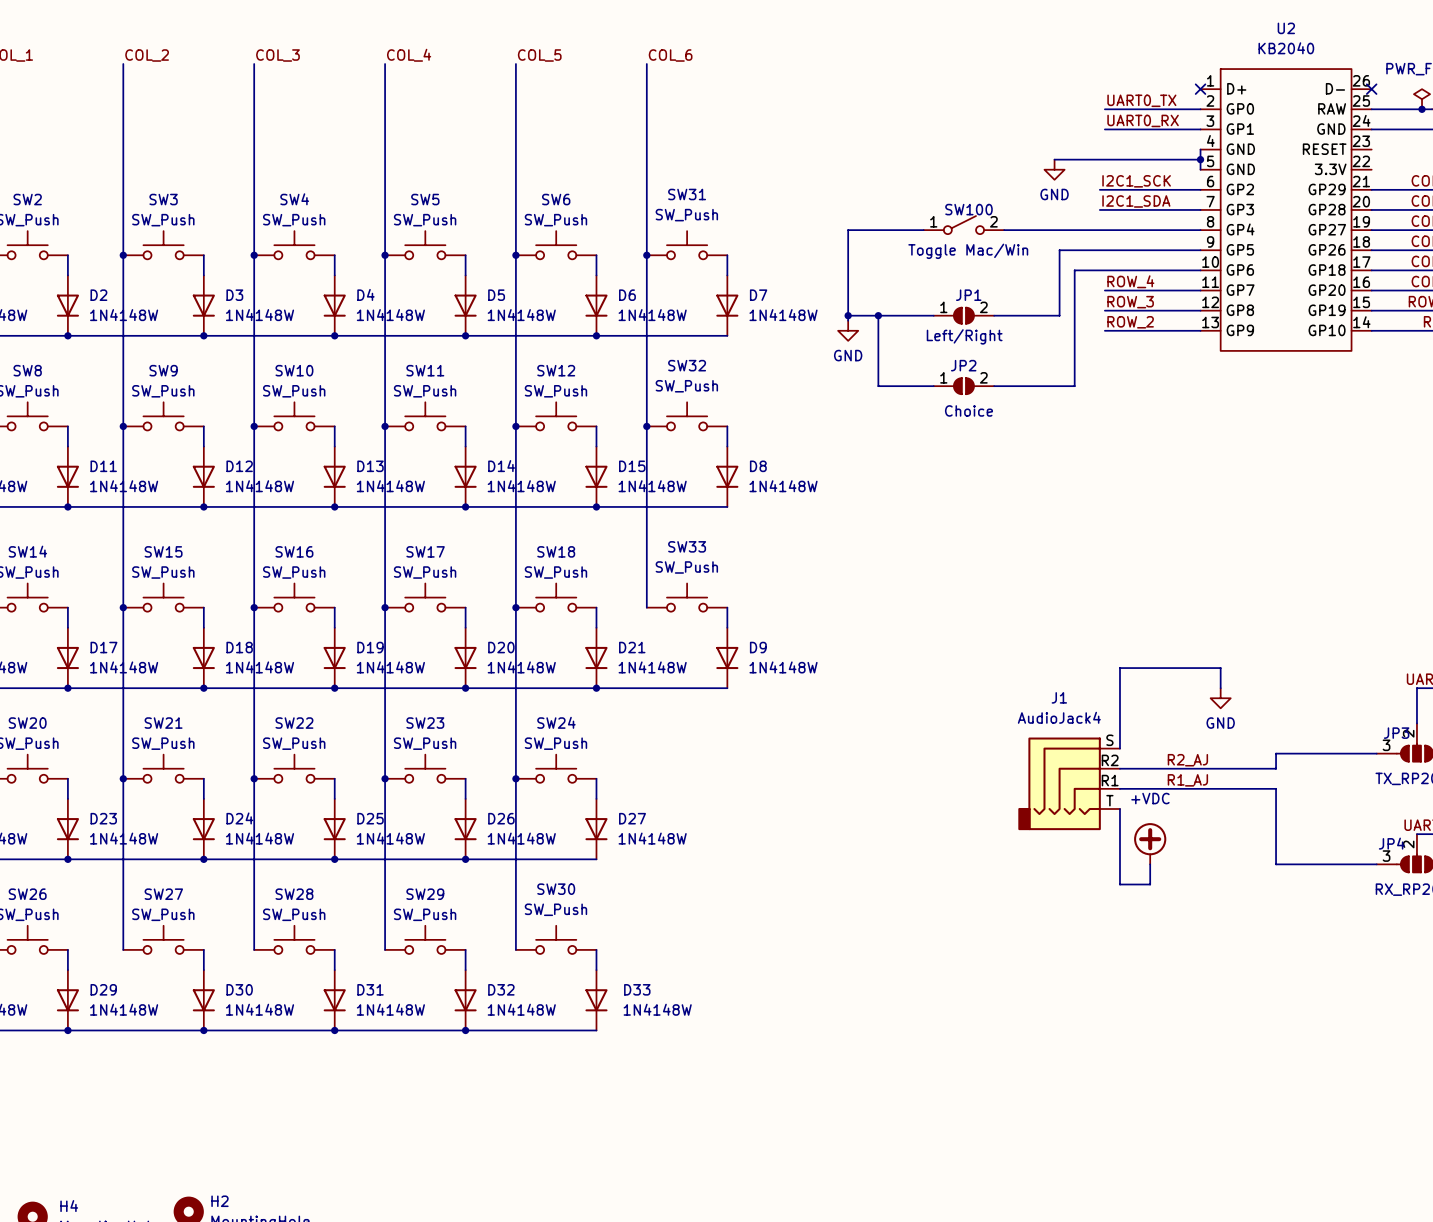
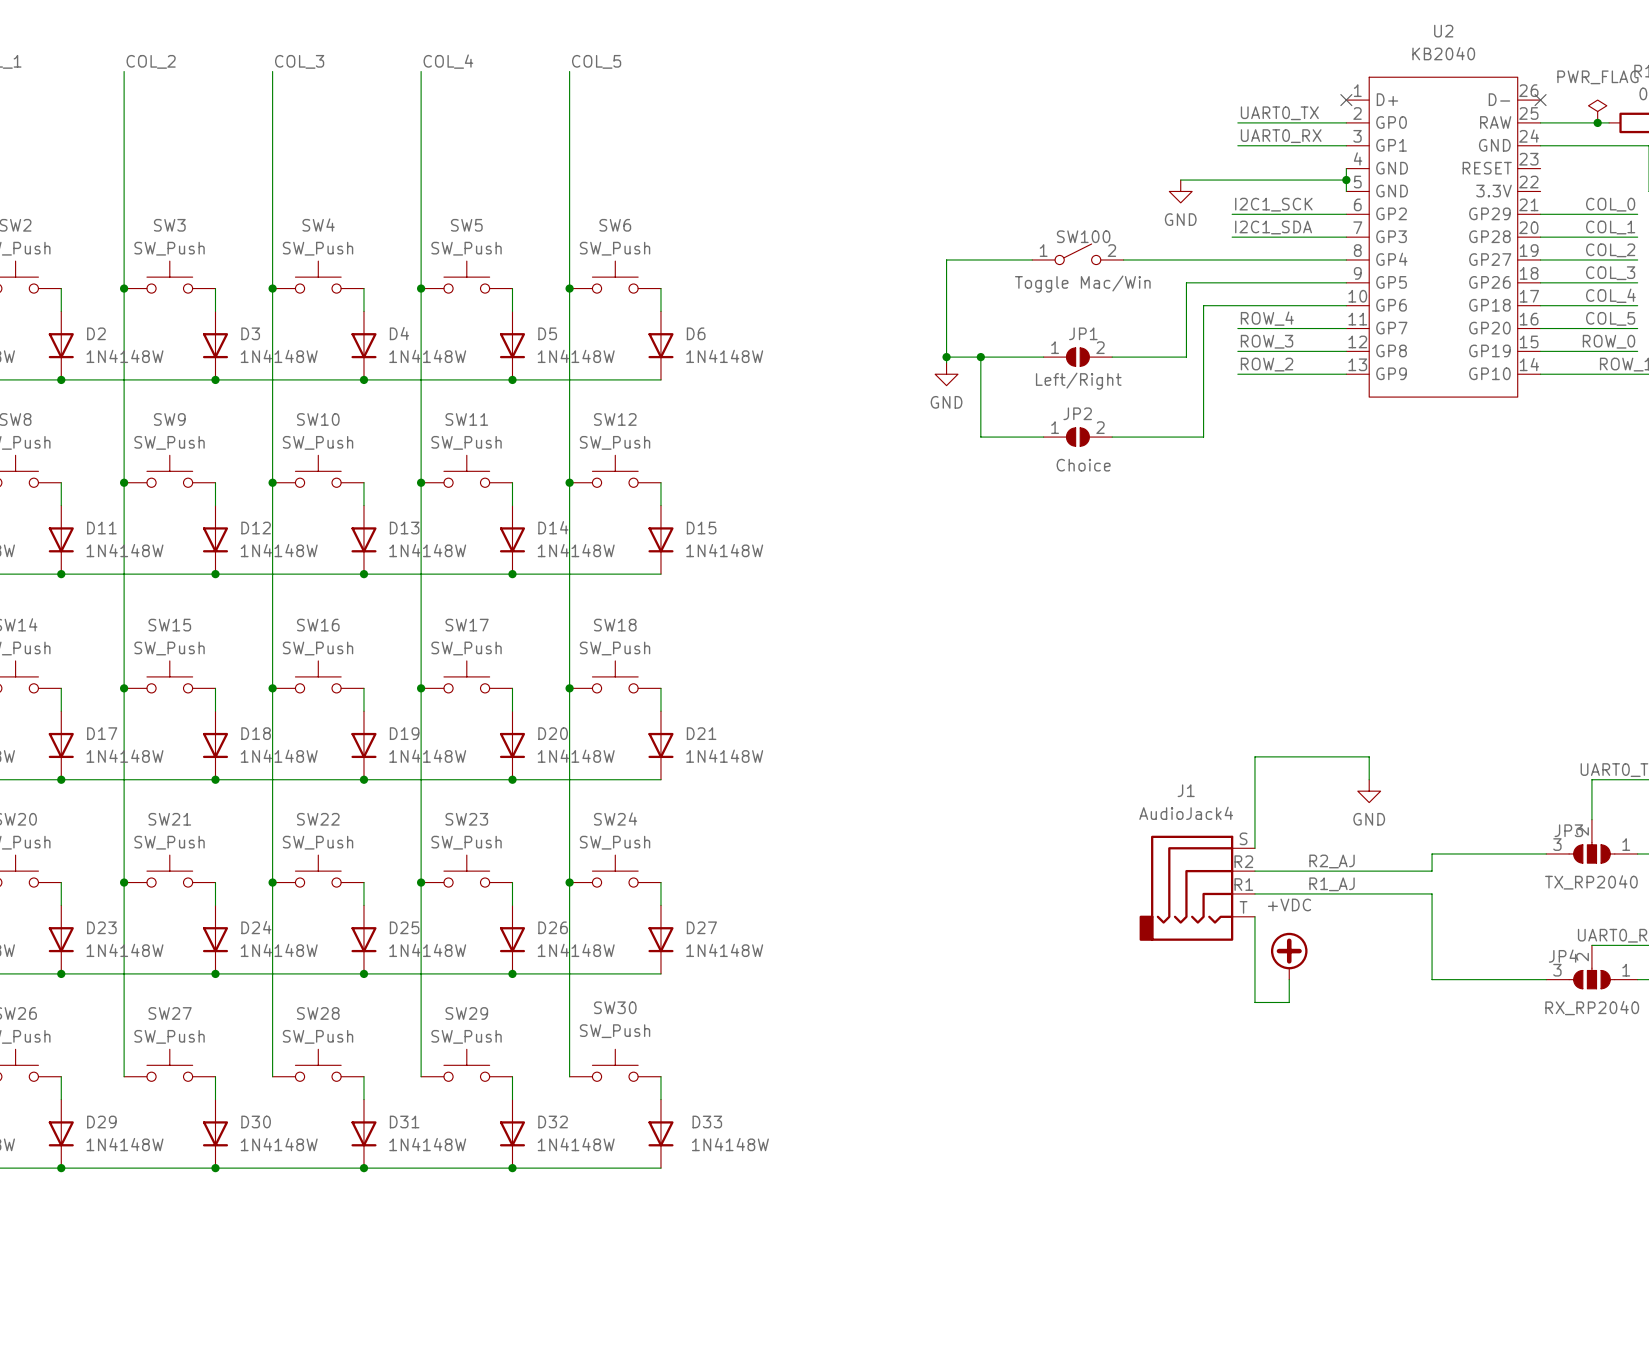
label: COL_6 (670, 55) -> none
wire: (646, 64) (646, 607) -> none
SW31: SW_Push (687, 245) -> none
junction: (646, 255) -> none
wire: (727, 255) (727, 275) -> none
D7: 1N4148W (727, 305) -> none
wire: (596, 335) (727, 335) -> none
junction: (596, 335) -> none
SW32: SW_Push (687, 416) -> none
junction: (646, 426) -> none
wire: (727, 426) (727, 446) -> none
D8: 1N4148W (727, 476) -> none
wire: (596, 506) (727, 506) -> none
junction: (596, 506) -> none
SW33: SW_Push (687, 597) -> none
wire: (727, 607) (727, 627) -> none
D9: 1N4148W (727, 657) -> none
wire: (596, 688) (727, 688) -> none
junction: (596, 688) -> none

